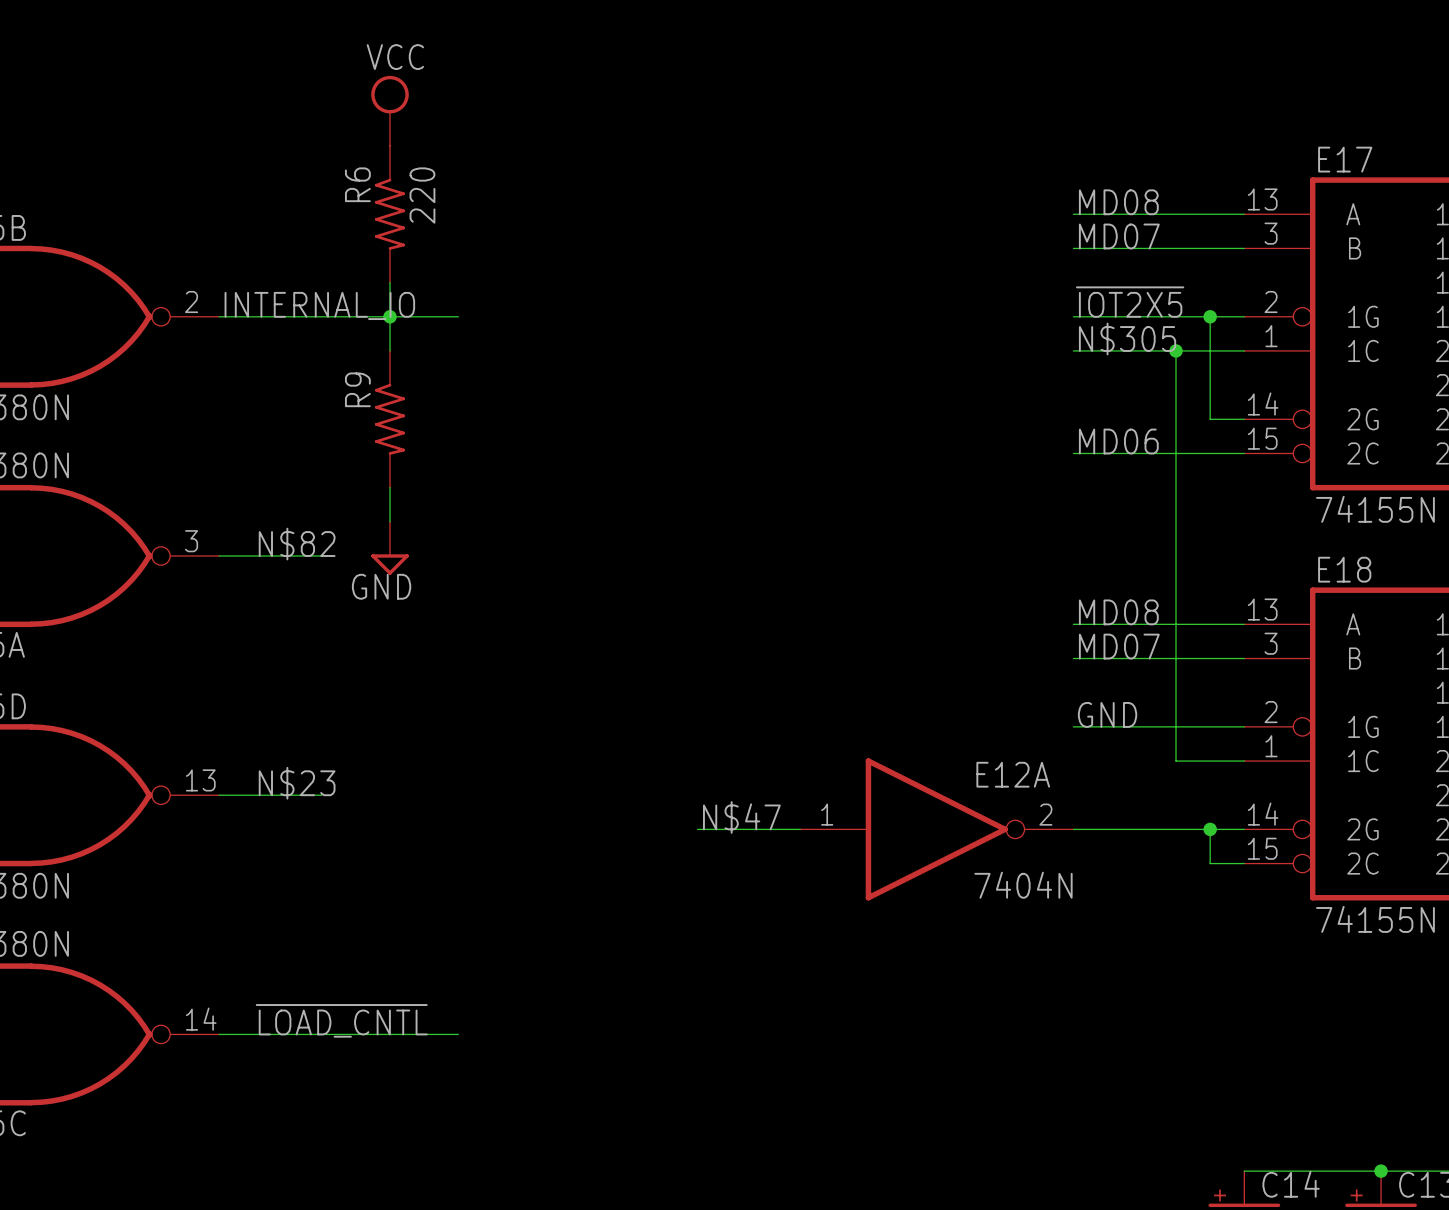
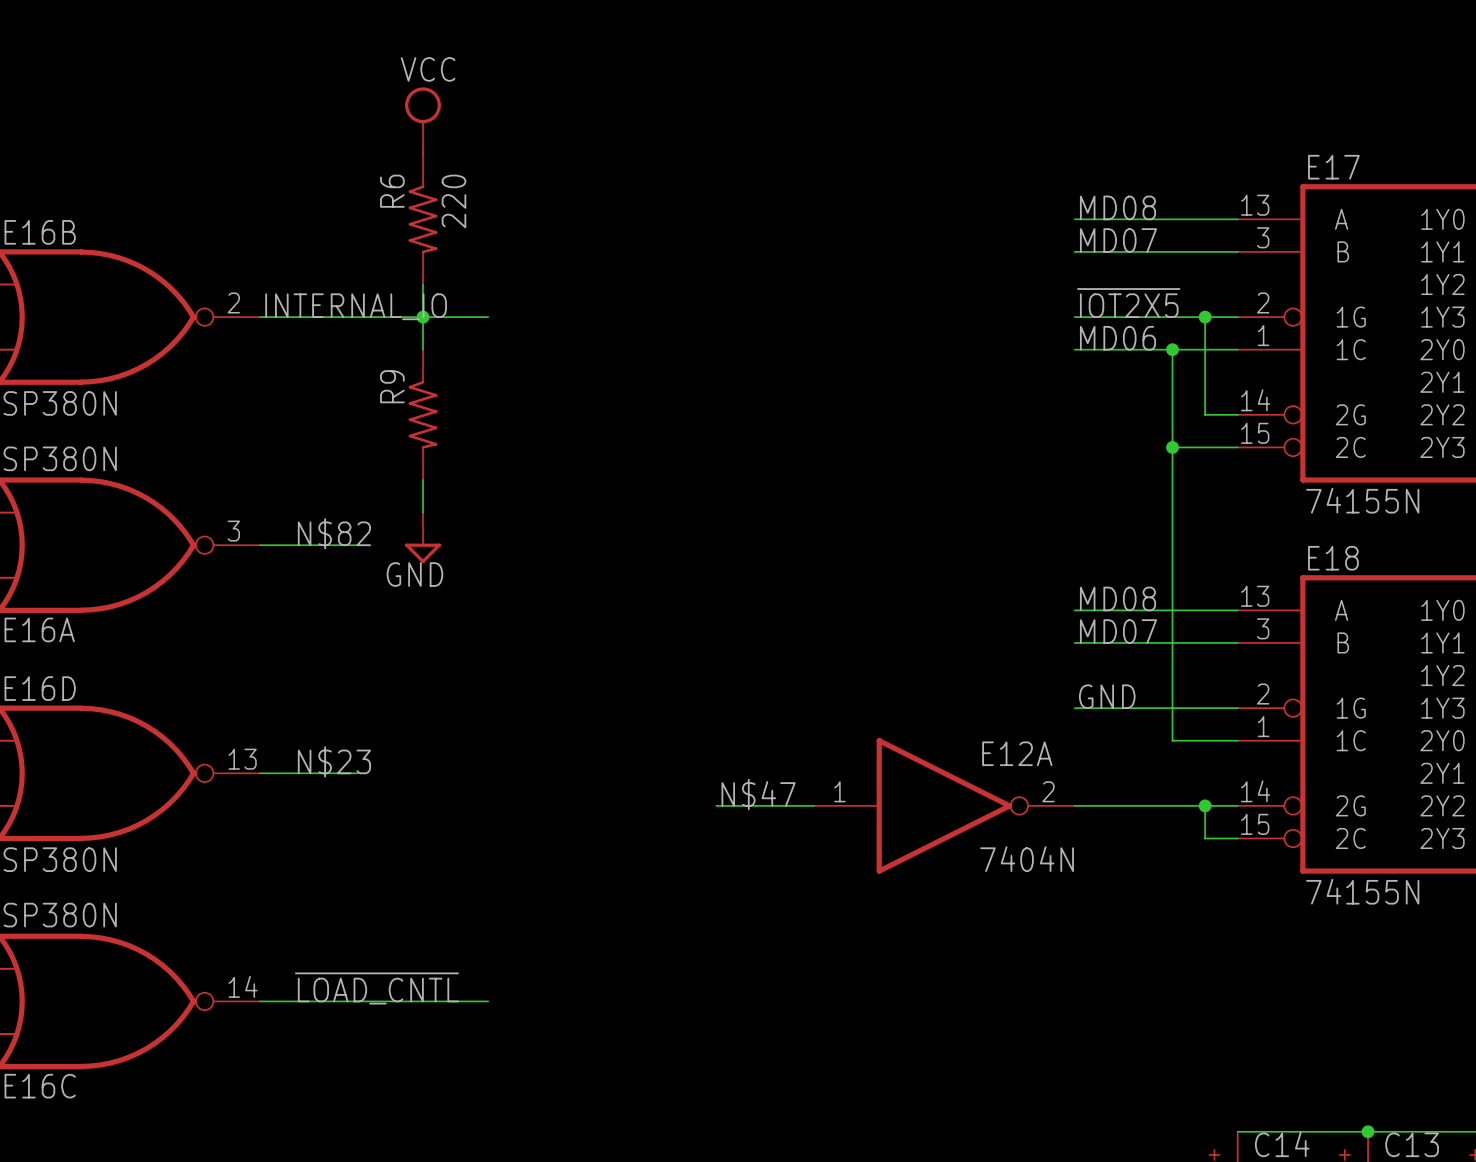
label: N$305 (1127, 339) -> MD06 (1117, 338)
label: MD06 (1118, 441) -> none
wire: (1073, 453) (1176, 453) -> none
junction: none -> (1172, 447)

